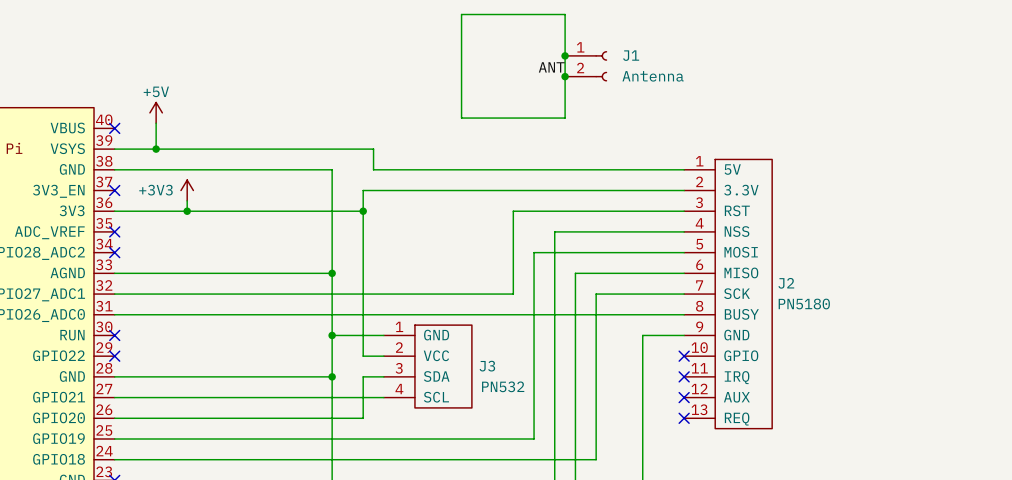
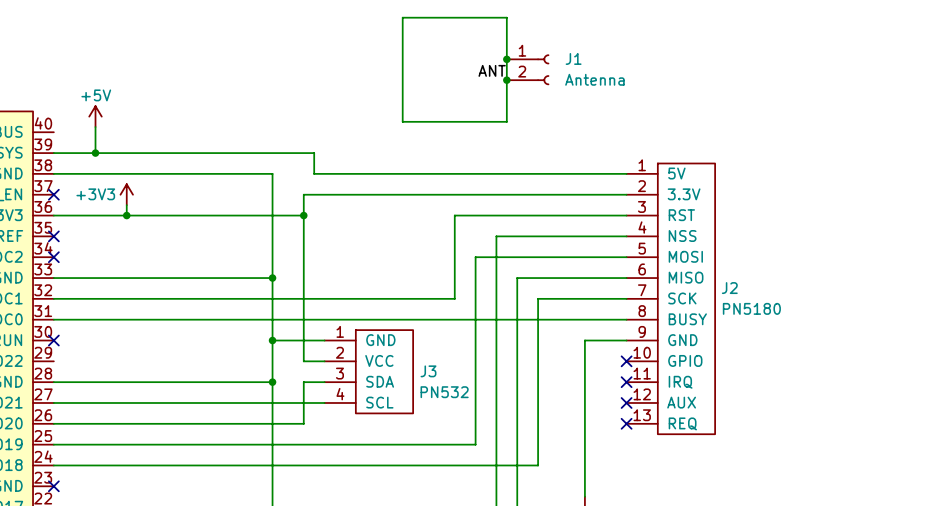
no-connect mark: (114, 128) -> none
no-connect mark: (114, 356) -> none

